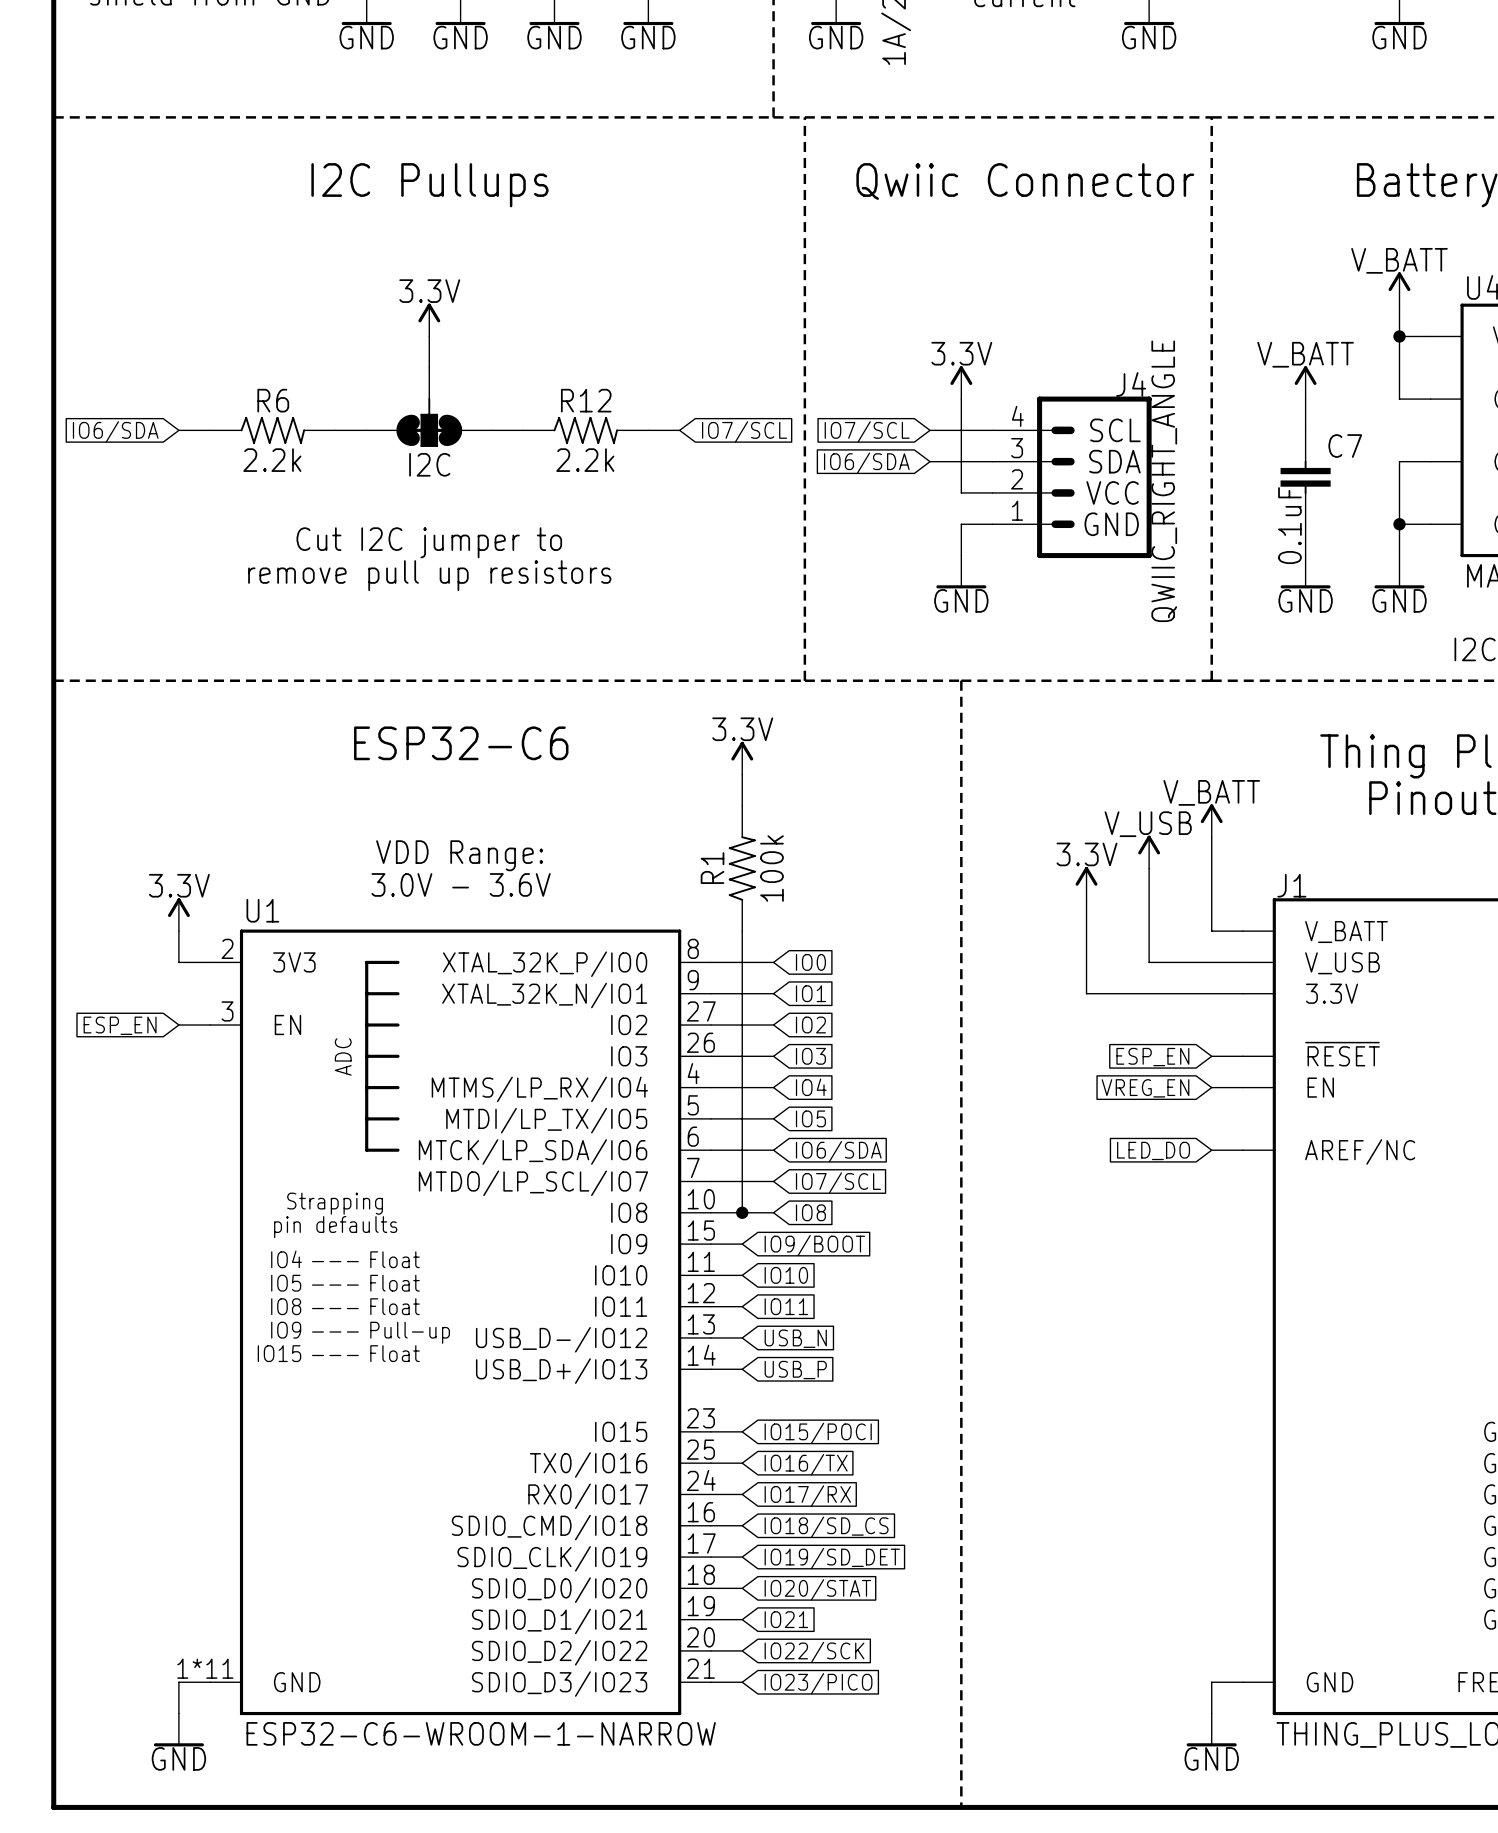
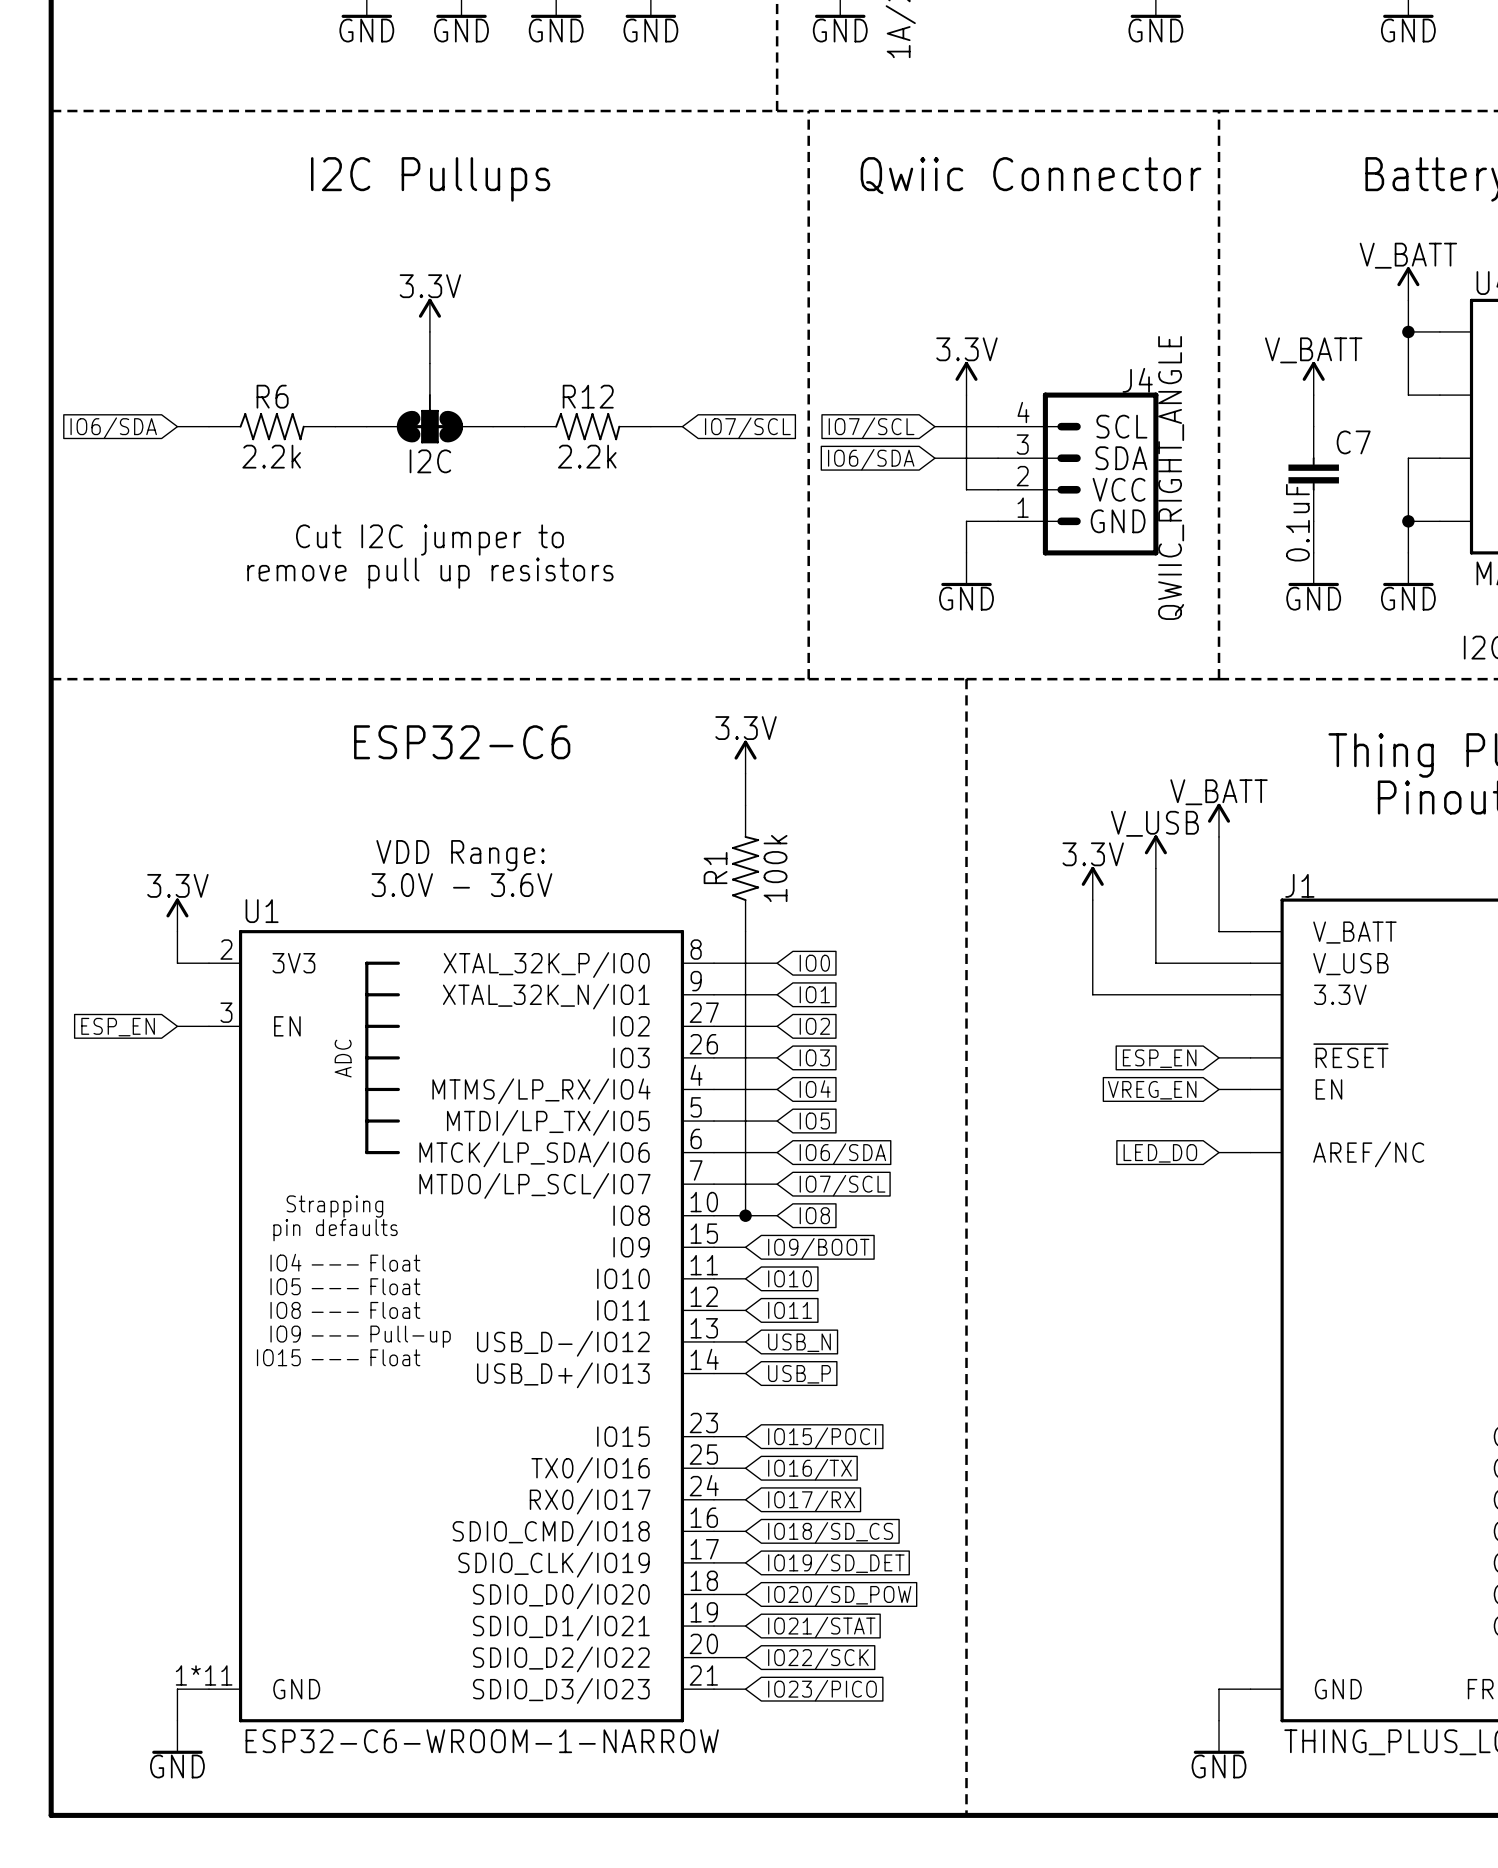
global label: IO20/STAT (817, 1589) -> IO20/SD_POW (839, 1595)
global label: IO21 (786, 1619) -> IO21/STAT (821, 1627)

